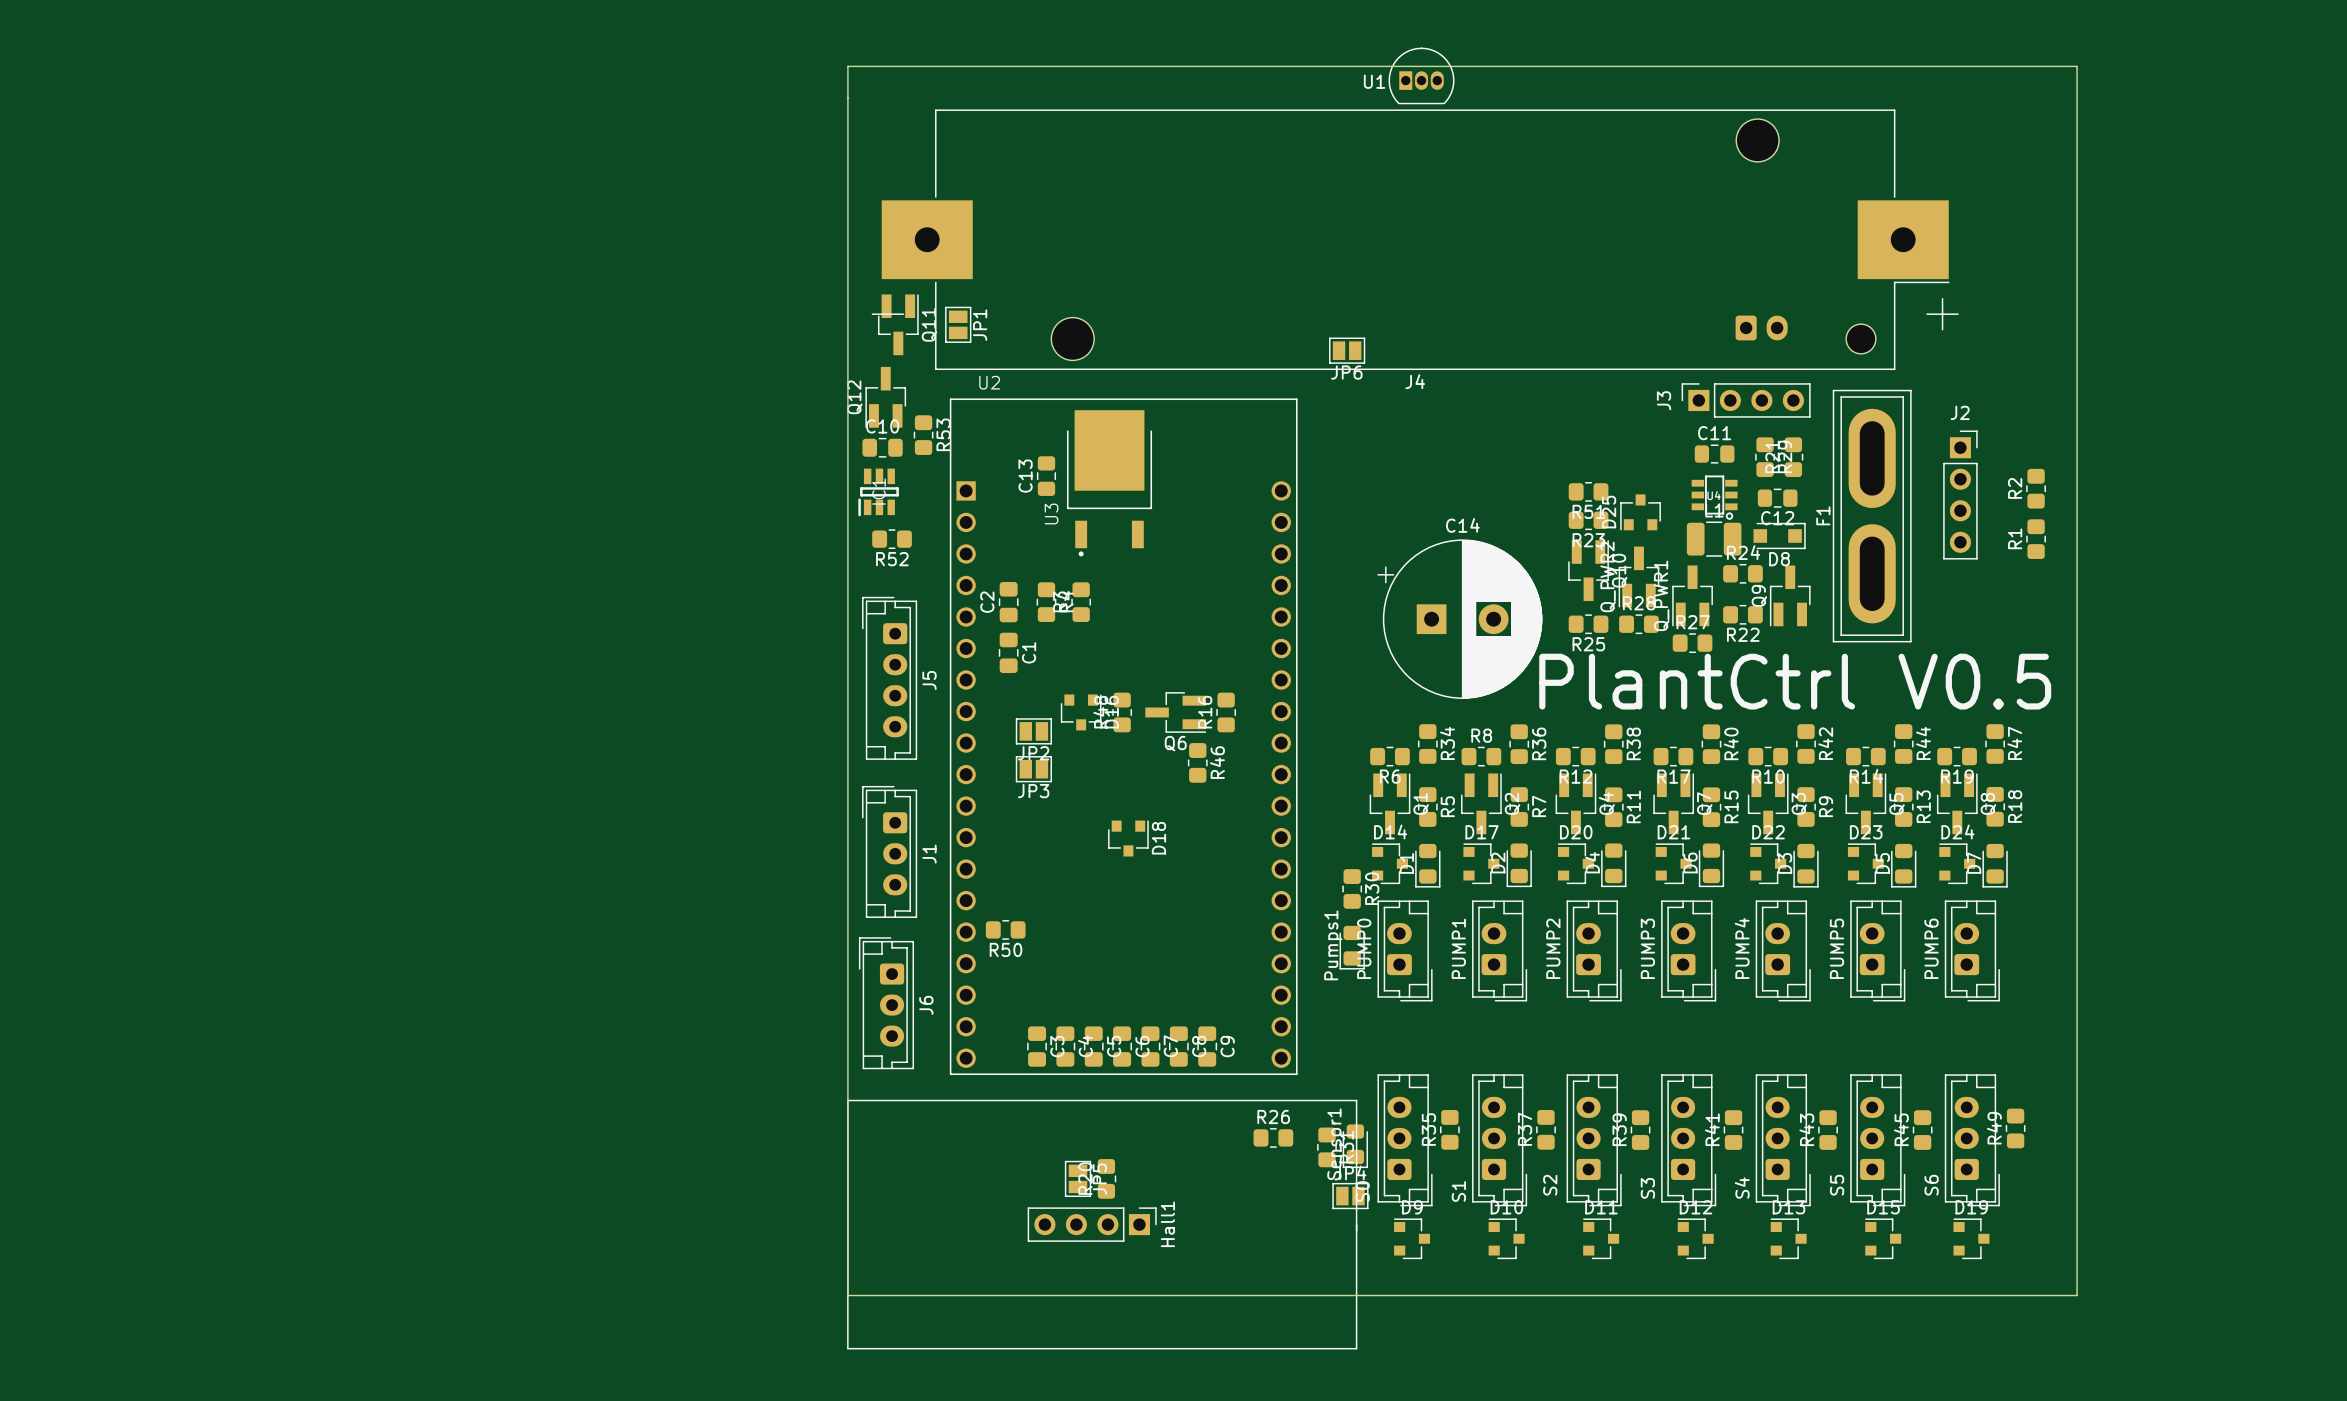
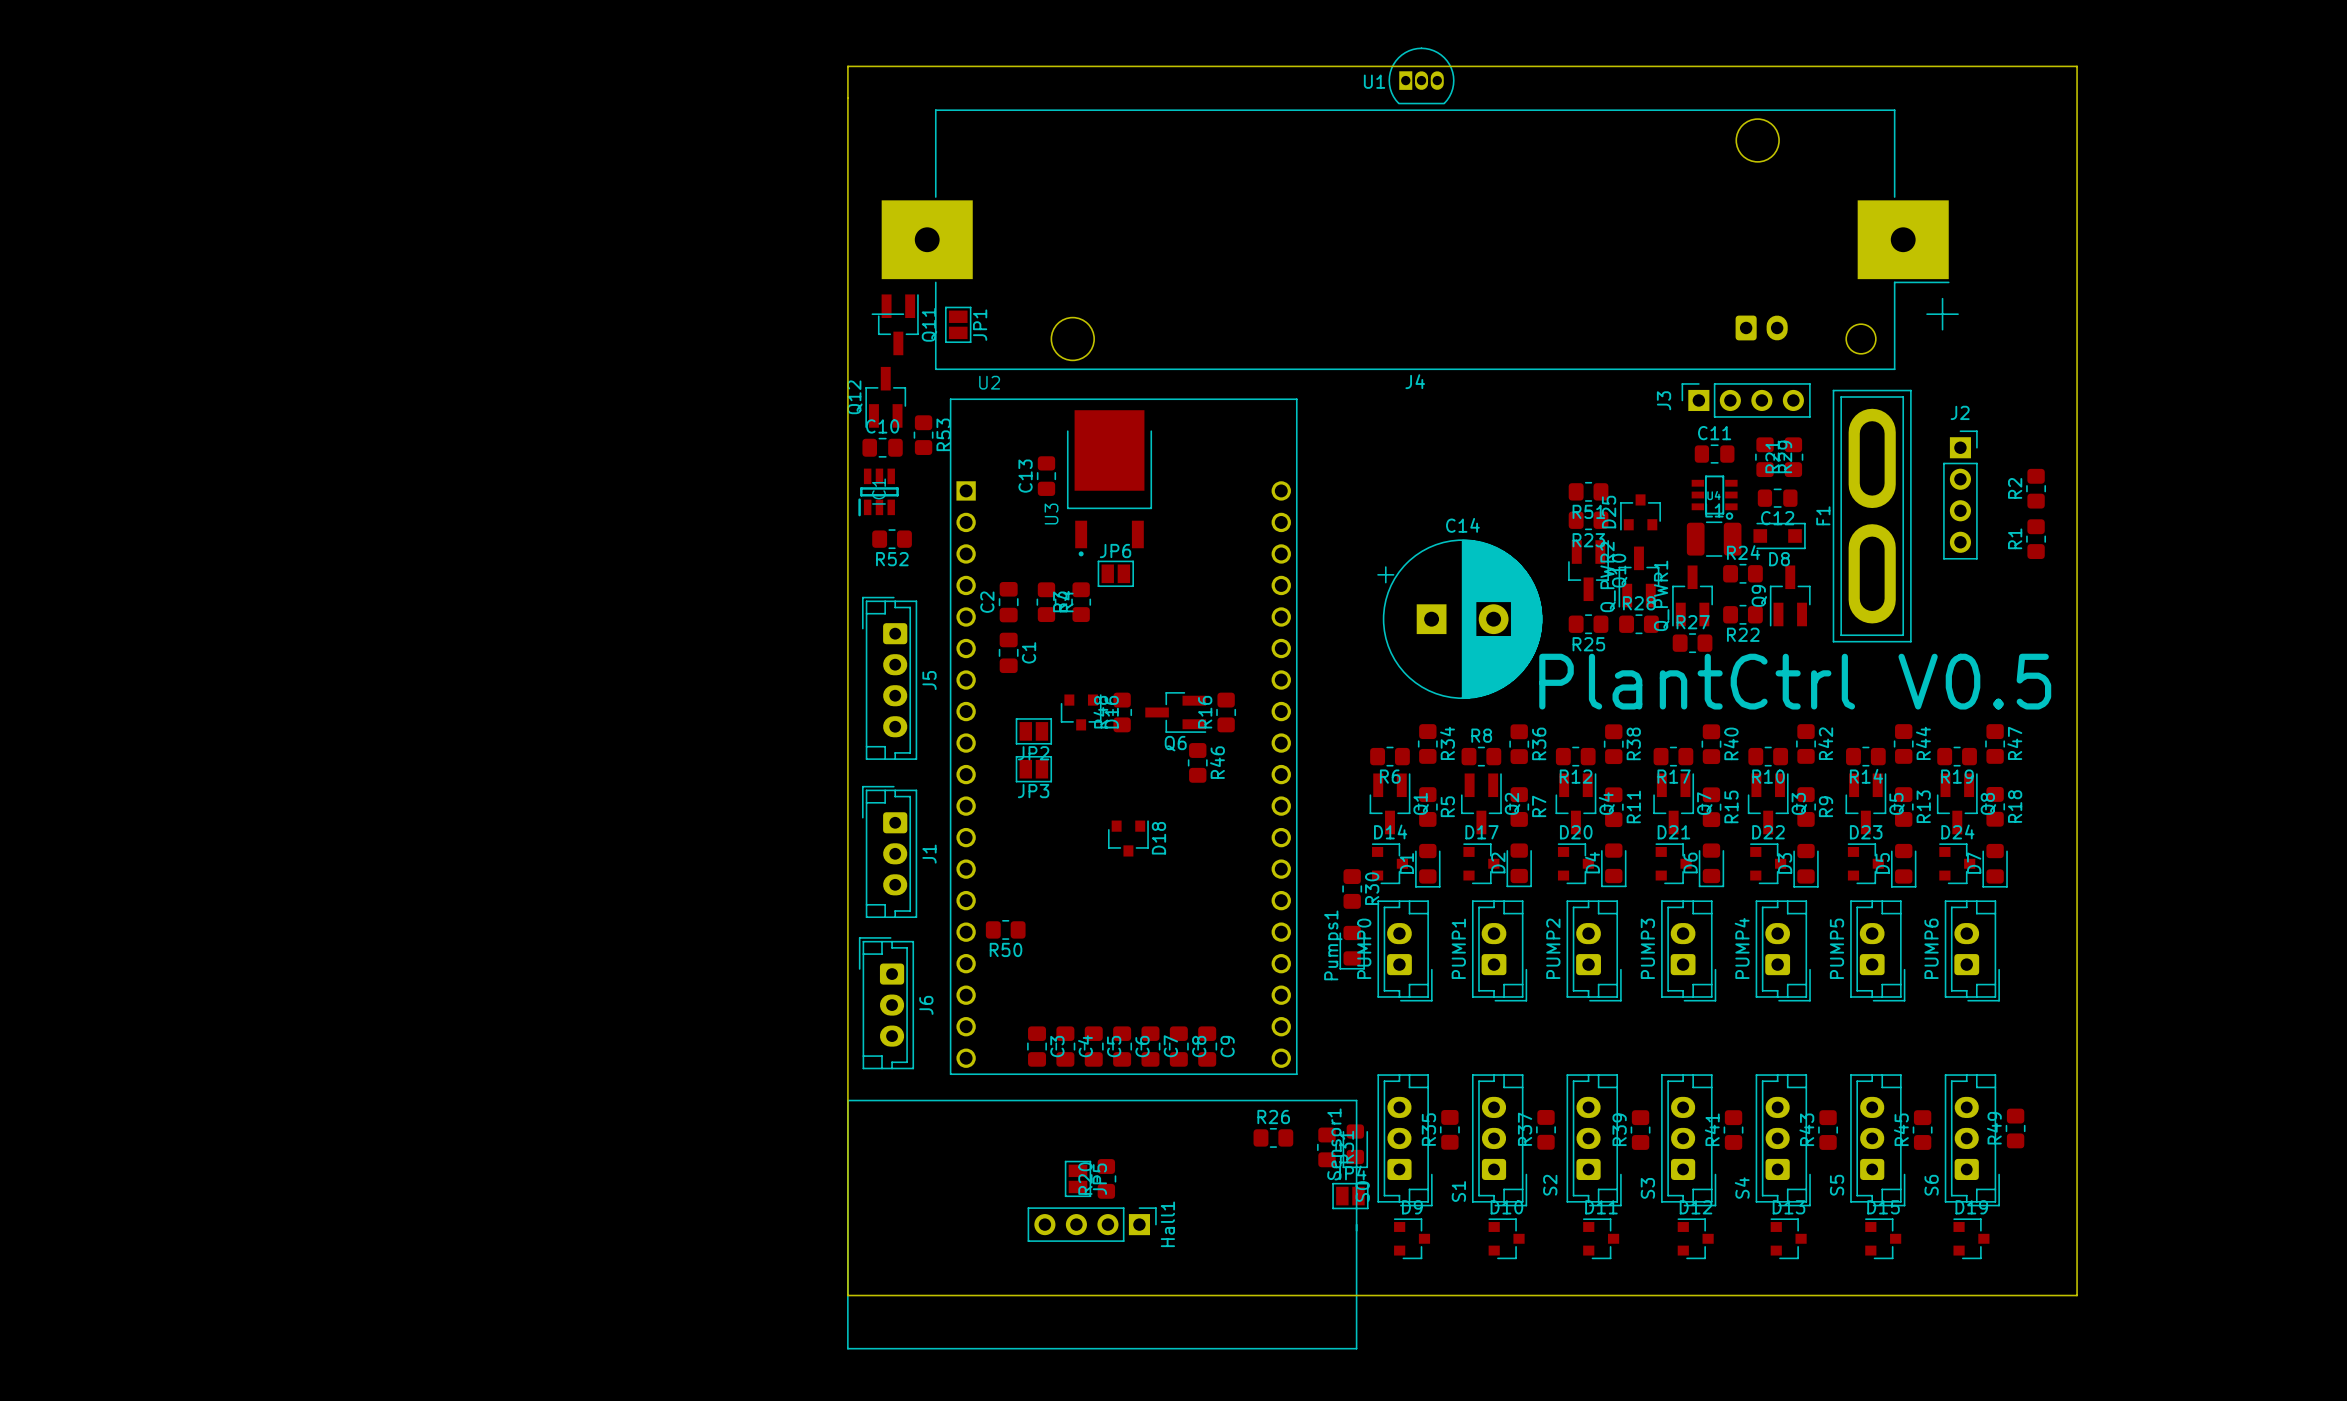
JP6 position: (1347, 350) -> (1115, 573)
JP6 name position: JP6 (1346, 372) -> JP6 (1115, 551)

